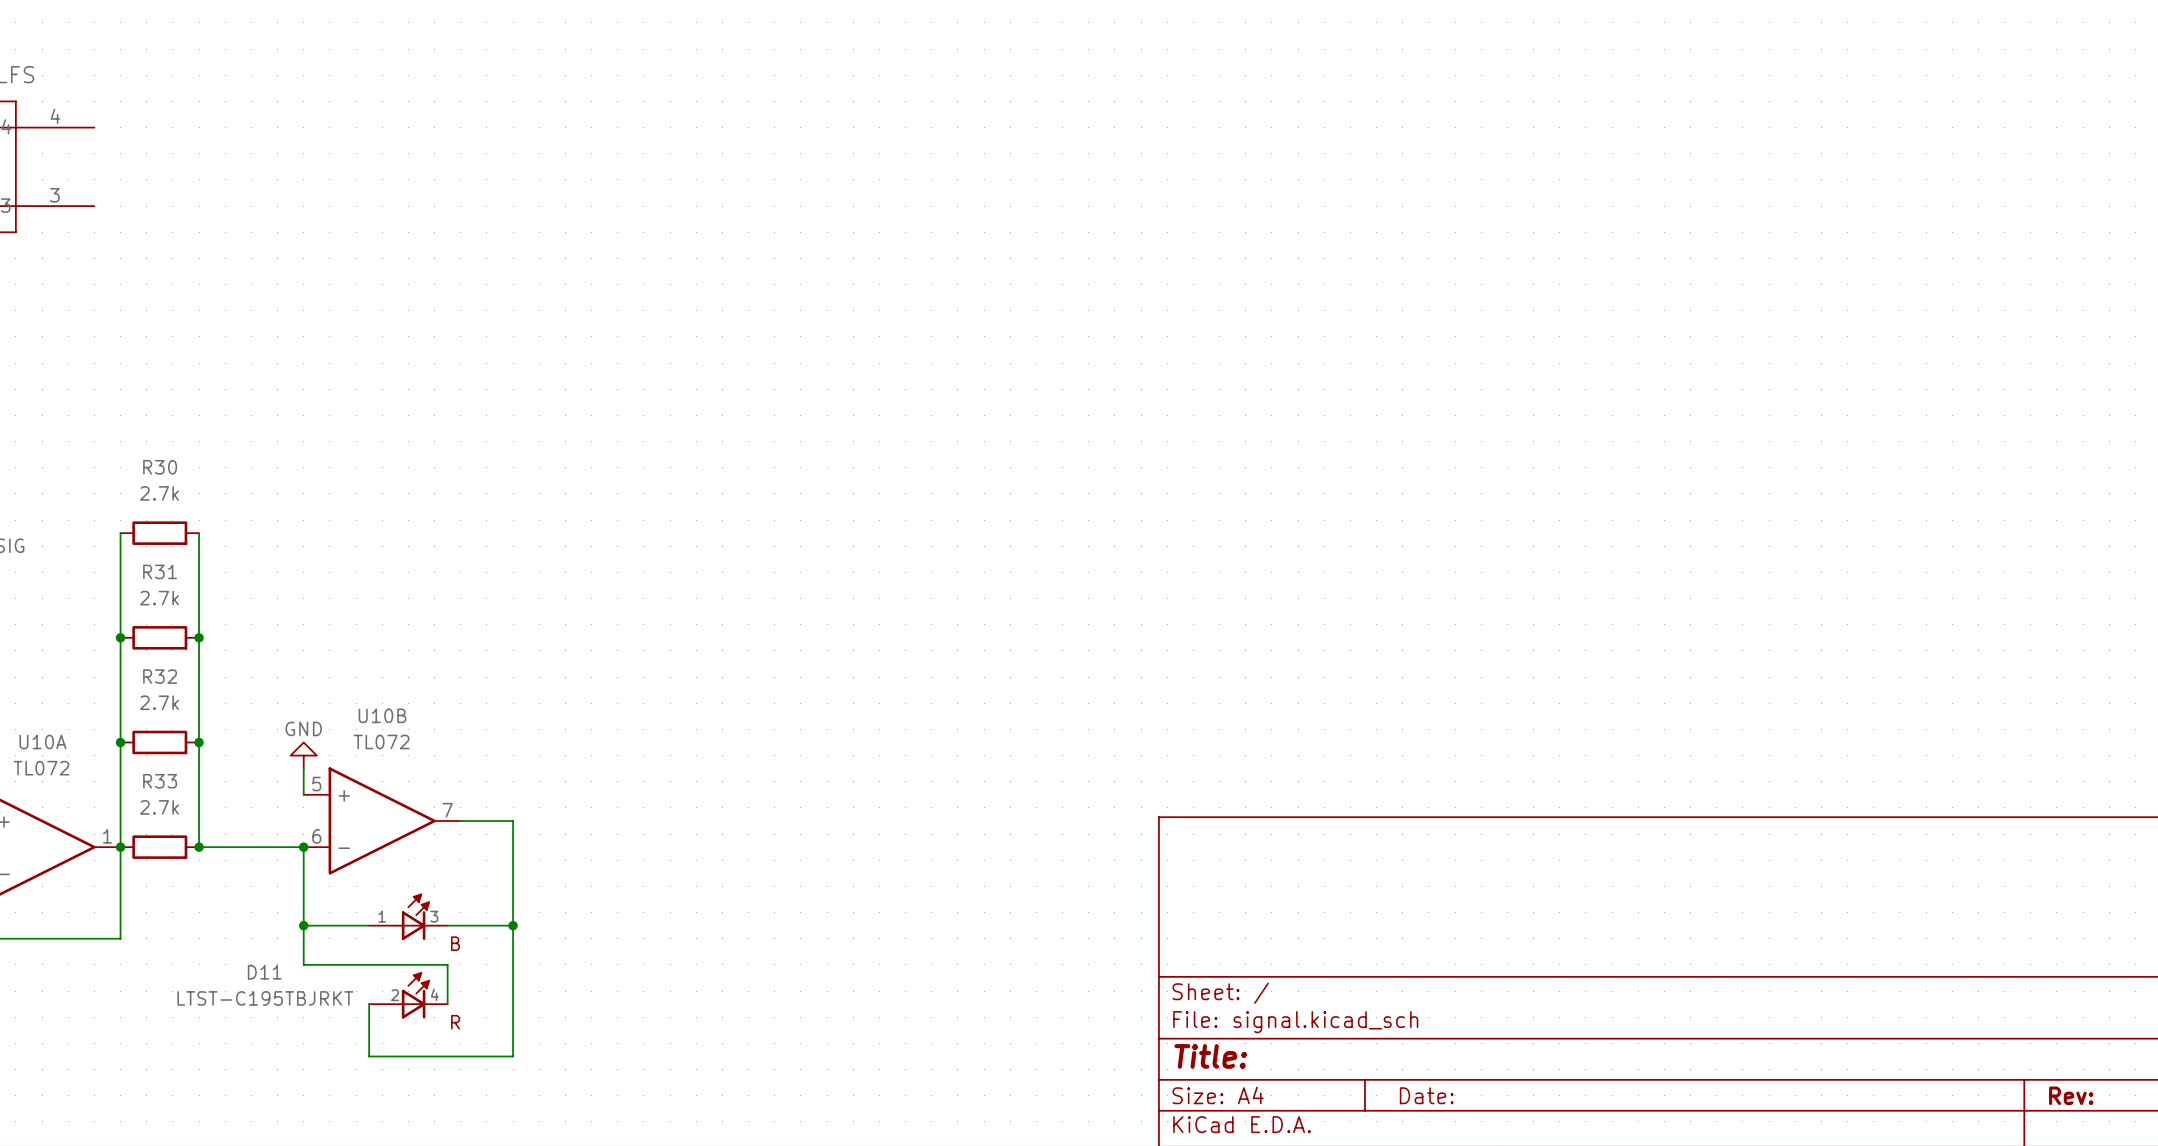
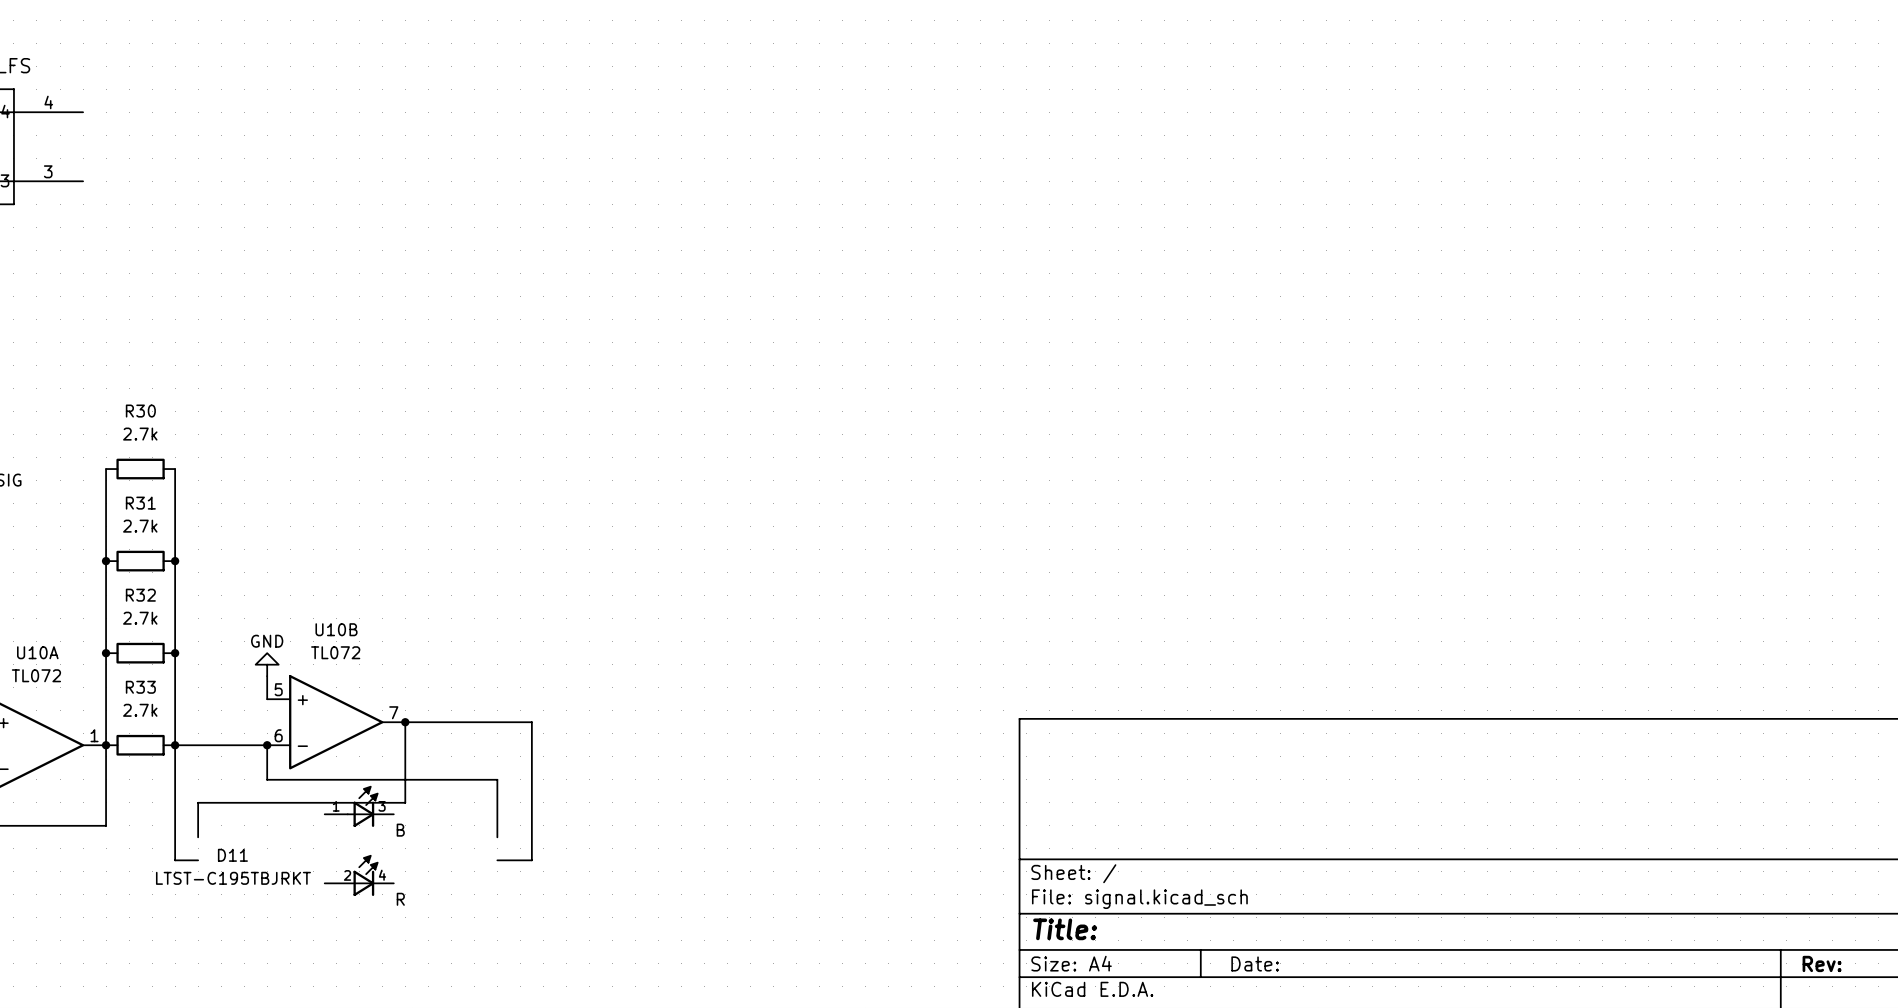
wire: none -> (405, 722) (405, 802) (198, 802) (198, 837)
junction: none -> (405, 722)
wire: (513, 820) (513, 1056) (369, 1056) (369, 1004) -> (451, 722) (531, 722) (531, 860) (497, 860)
wire: none -> (175, 745) (175, 860) (198, 860)
wire: (303, 886) (303, 964) (447, 964) (447, 1004) -> (267, 779) (497, 779) (497, 837)
wire: (303, 925) (369, 925) -> none
junction: (303, 925) -> none
wire: (447, 925) (513, 925) -> none
junction: (513, 925) -> none

